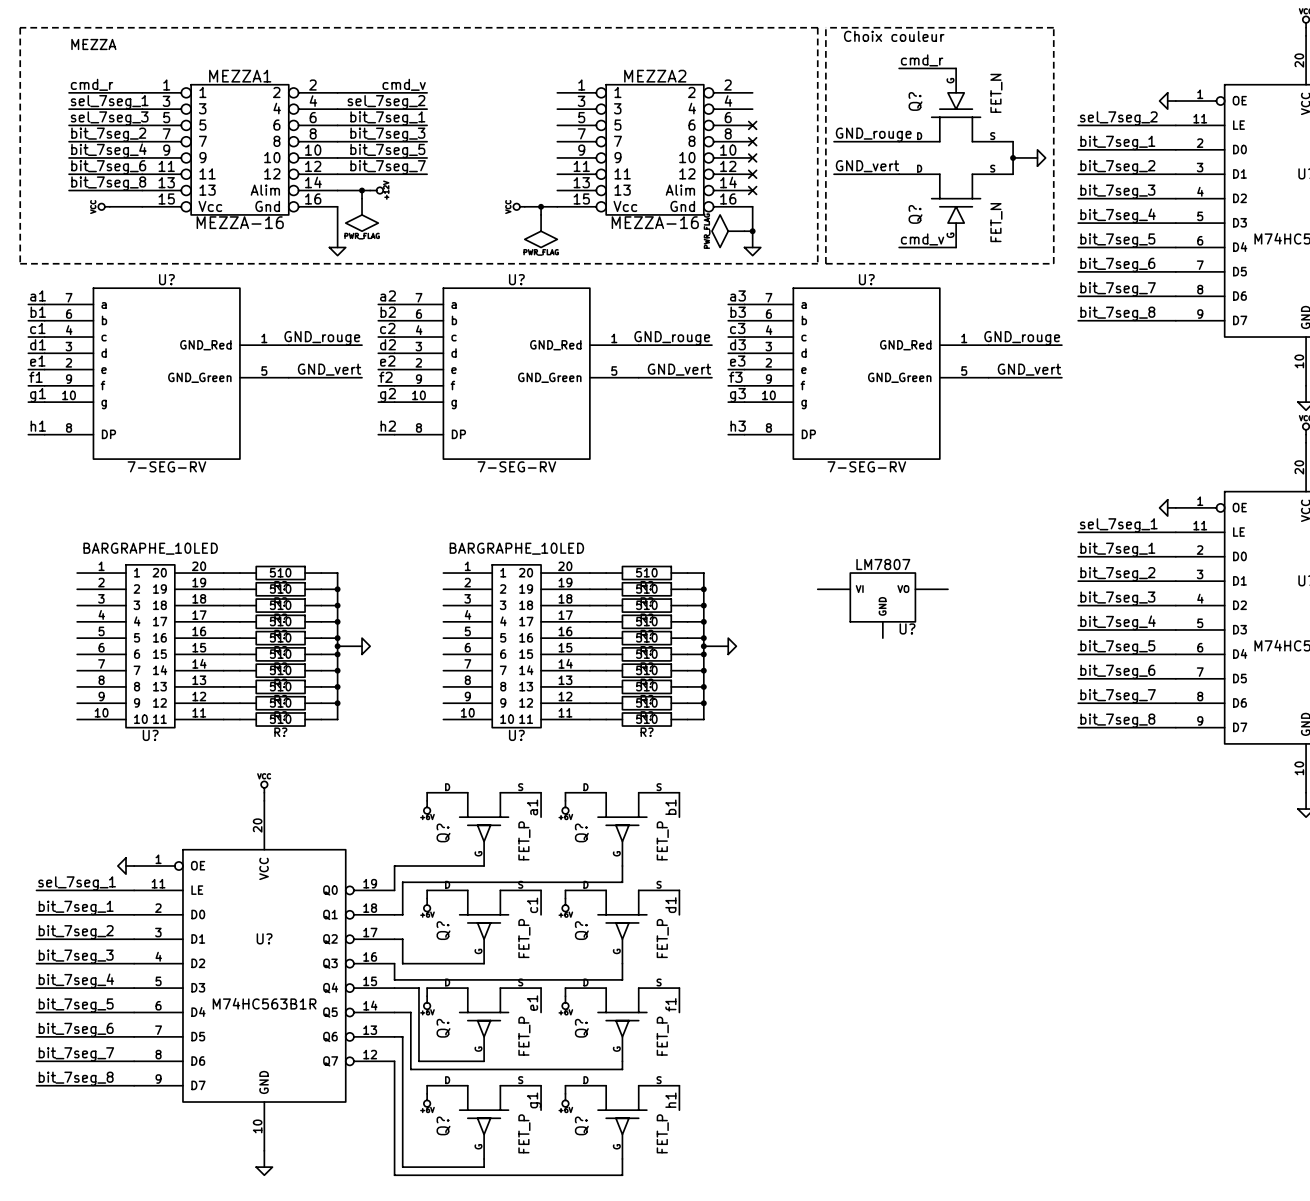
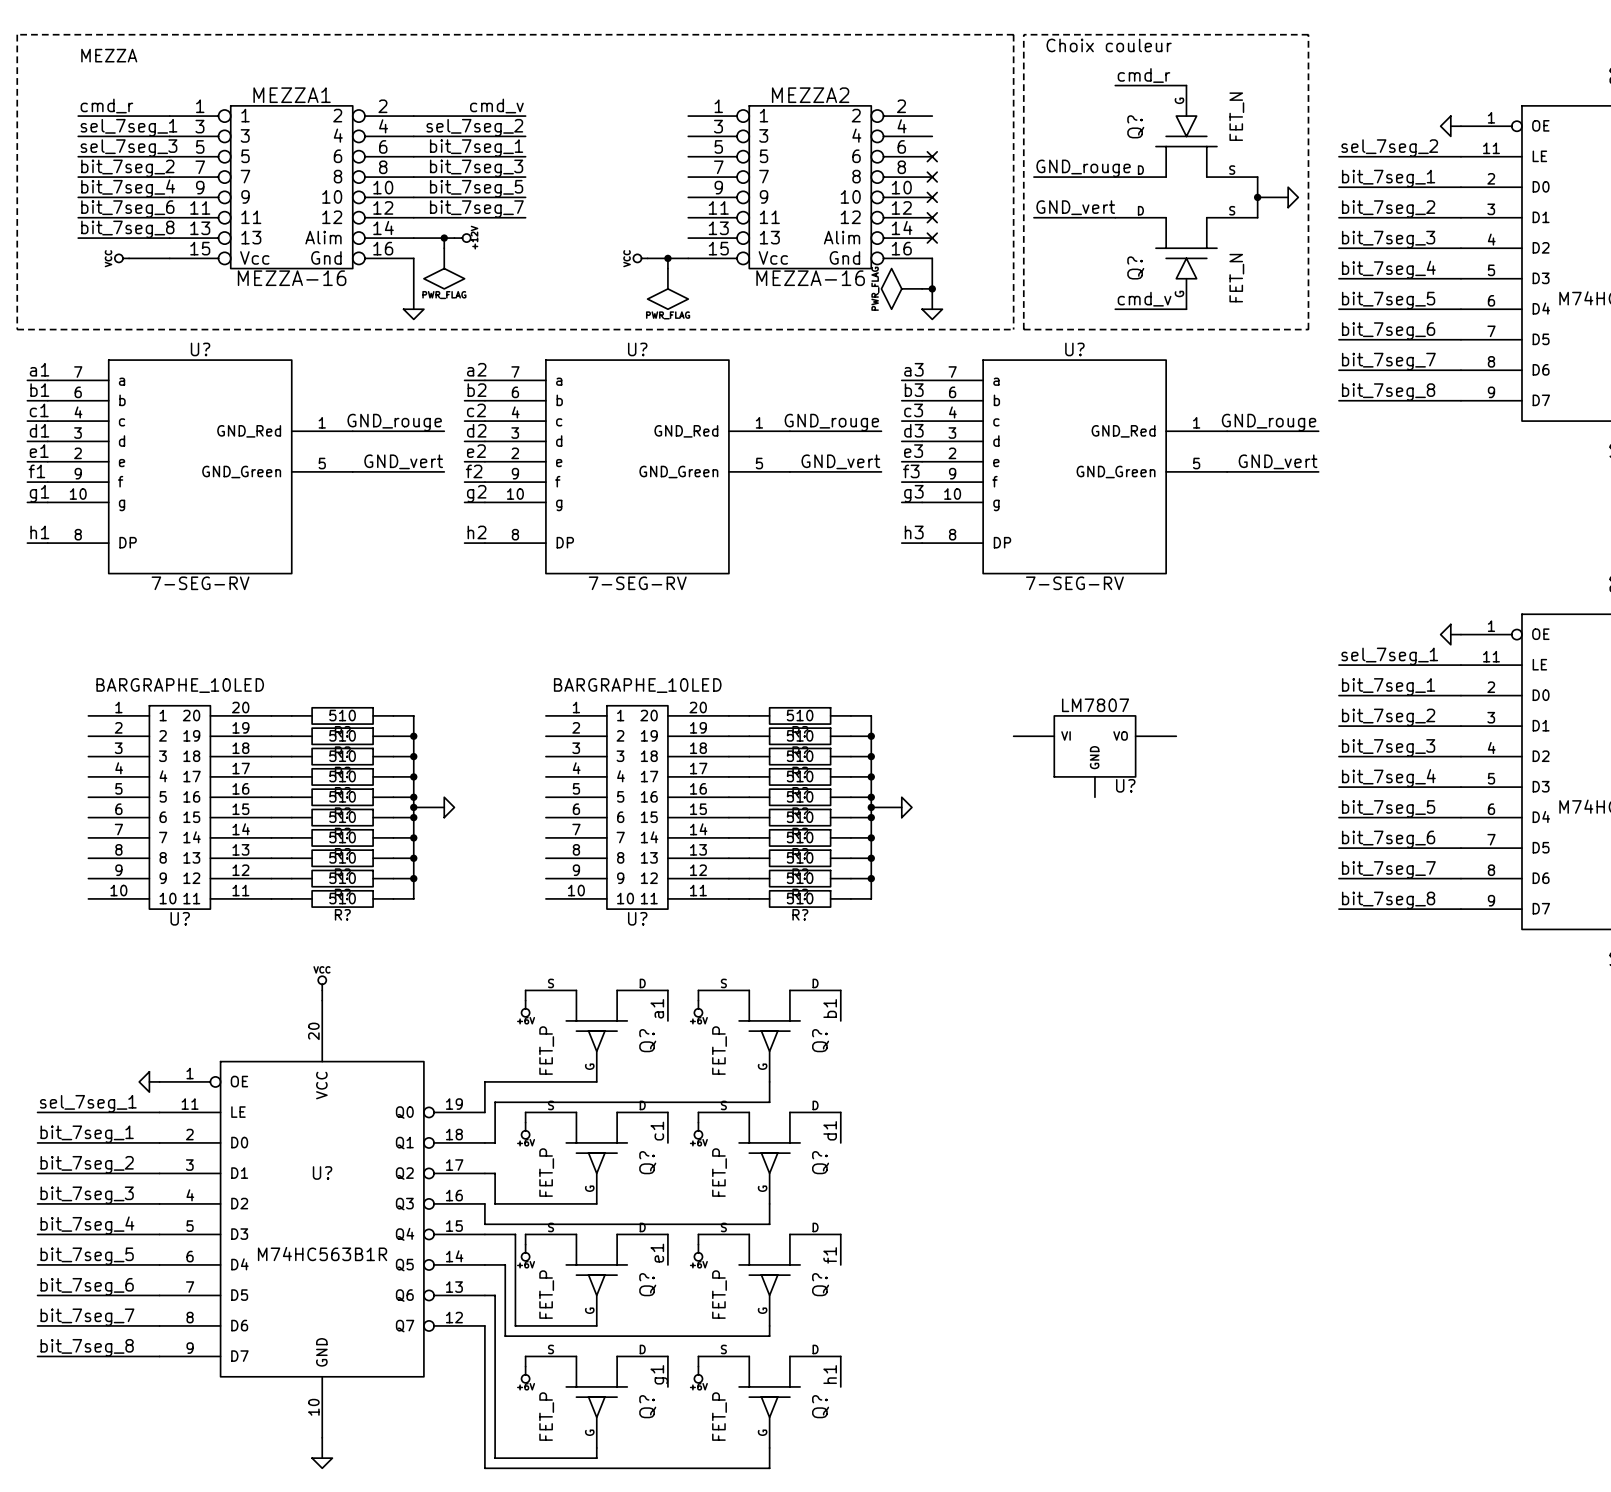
Q? flip: as is (484, 817) -> left-right (596, 1020)
Q? flip: as is (622, 817) -> left-right (769, 1020)
Q? flip: as is (484, 914) -> left-right (596, 1142)
Q? flip: as is (622, 914) -> left-right (769, 1142)
Q? flip: as is (484, 1012) -> left-right (596, 1264)
Q? flip: as is (622, 1012) -> left-right (769, 1264)
Q? flip: as is (484, 1110) -> left-right (596, 1386)
Q? flip: as is (622, 1110) -> left-right (769, 1386)

